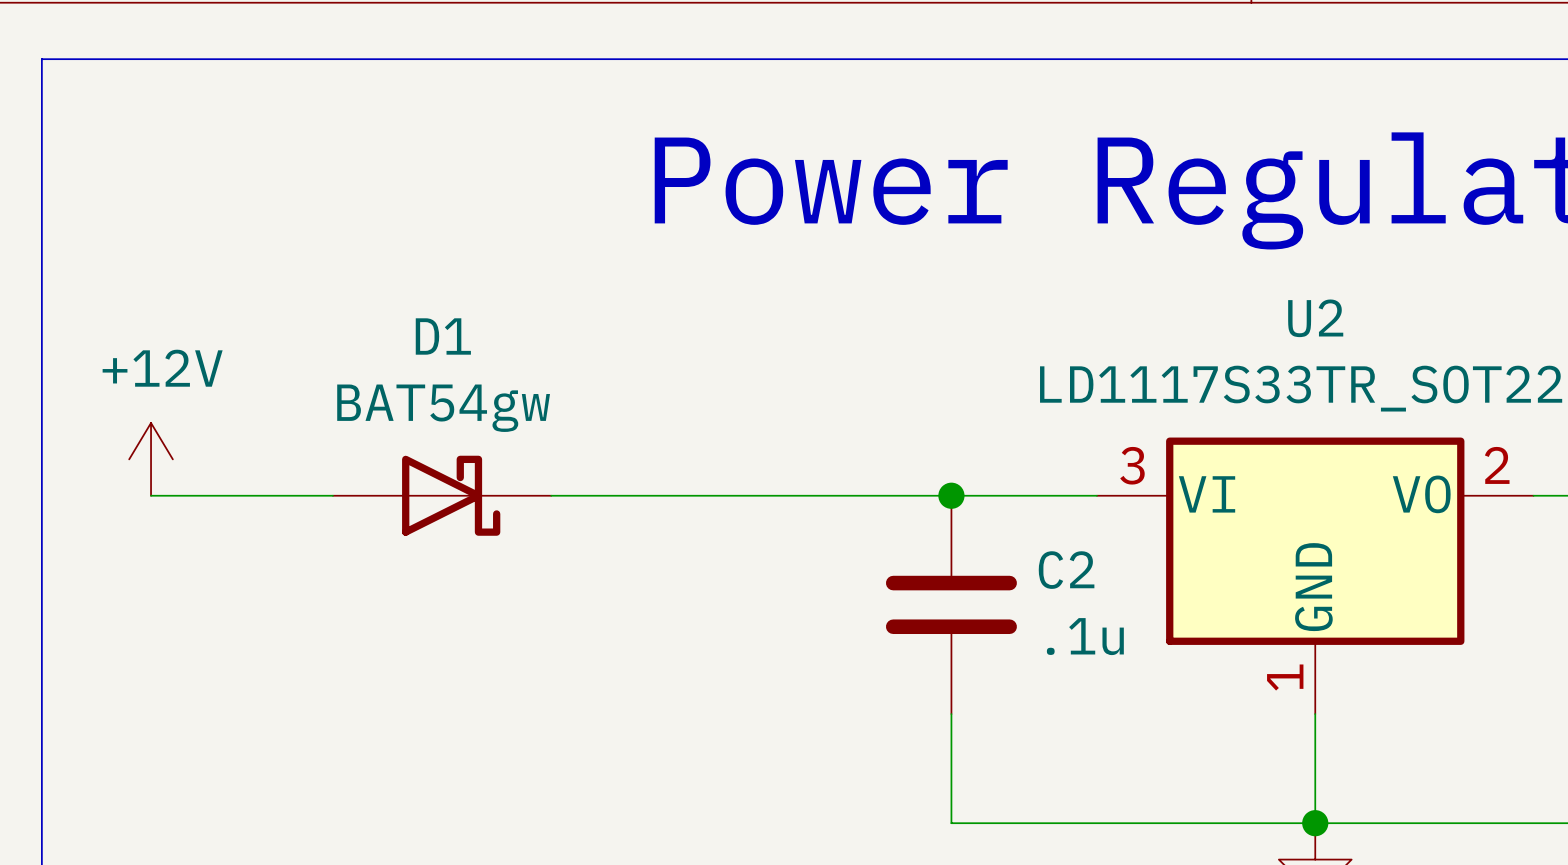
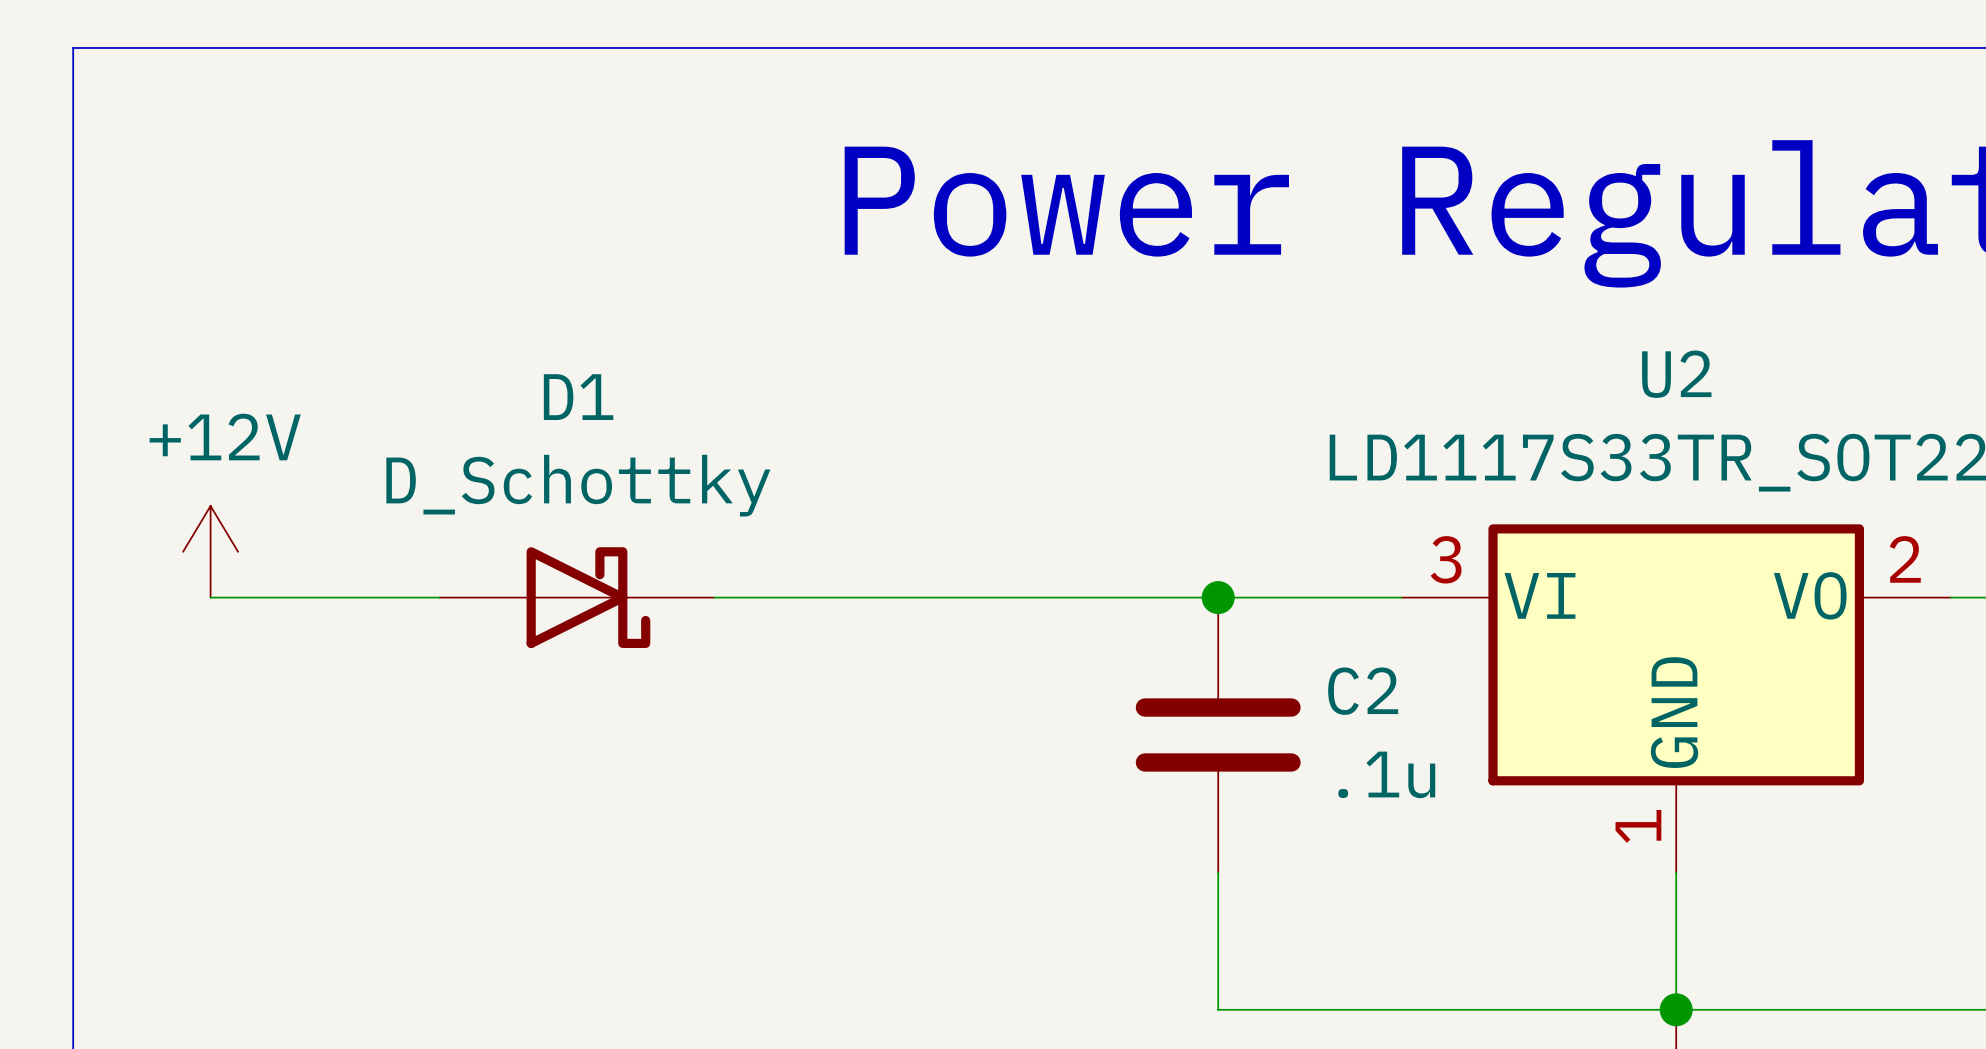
D1 value: BAT54gw (443, 408) -> D_Schottky (578, 485)

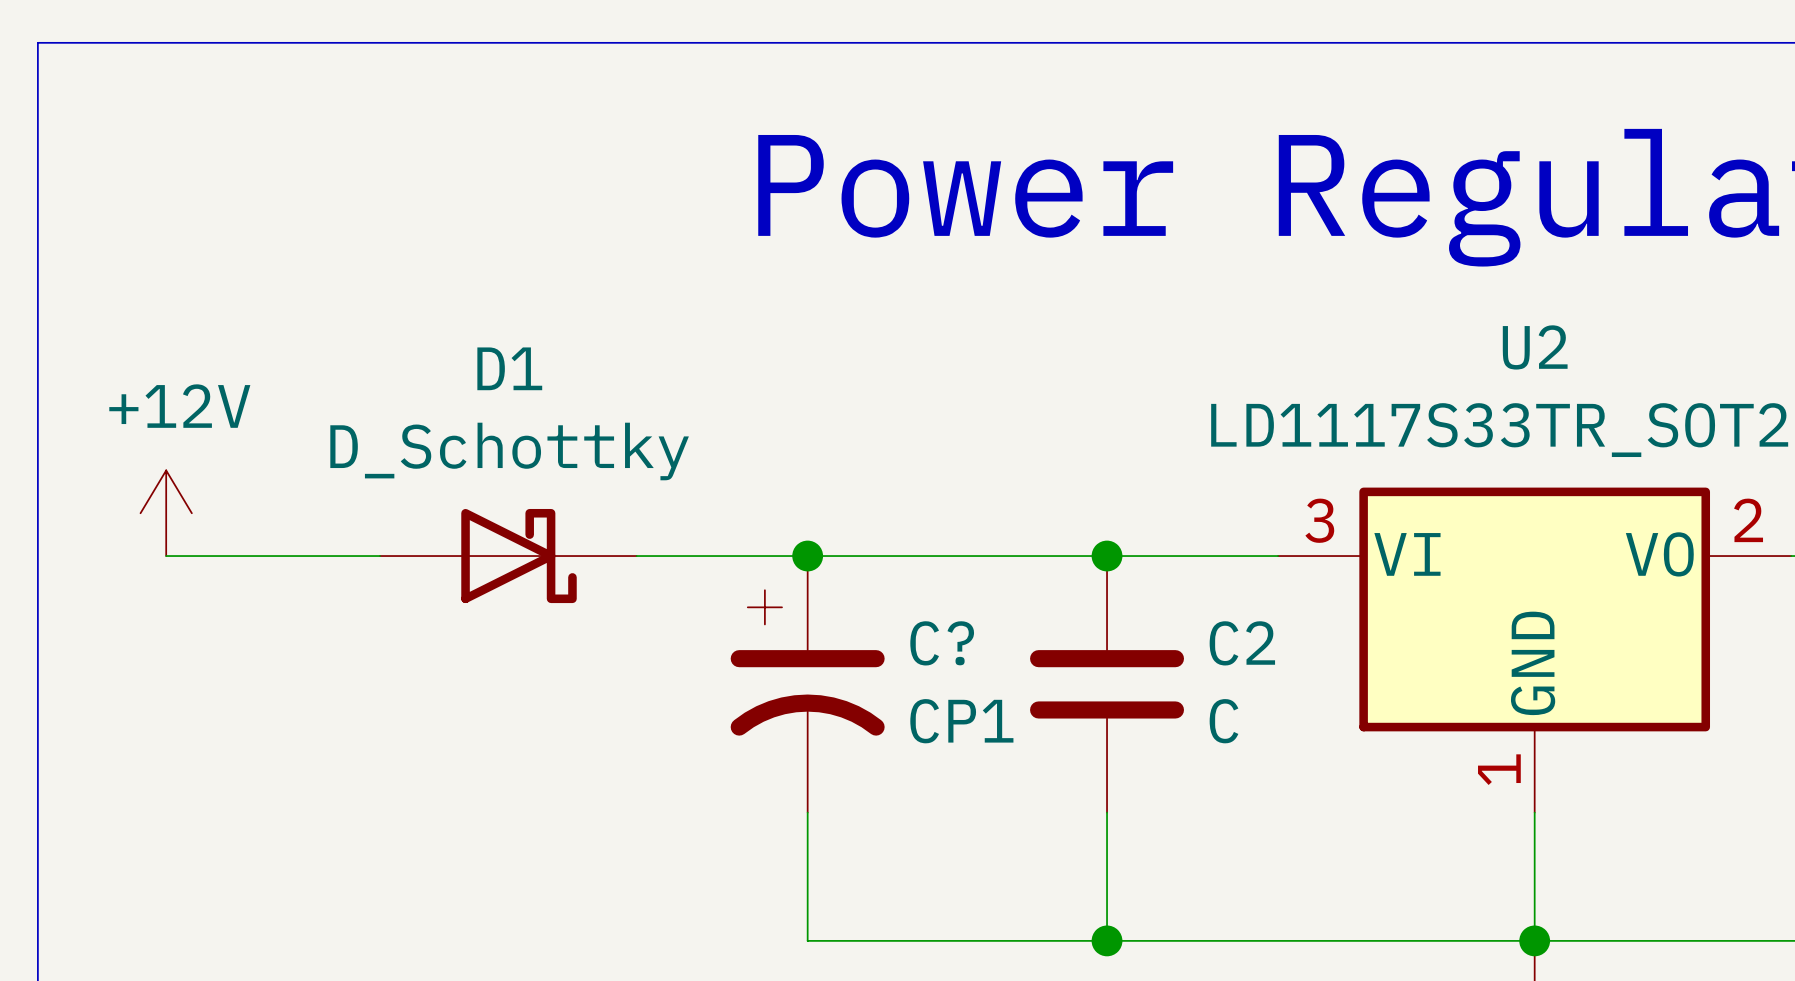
junction: none -> (807, 556)
C?: none -> CP1 (807, 684)
C2 value: .1u (1386, 774) -> C (1224, 721)
wire: none -> (807, 812) (807, 940) (1107, 940)
junction: none -> (1107, 940)

